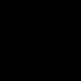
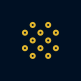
part: none -> (40, 40)

